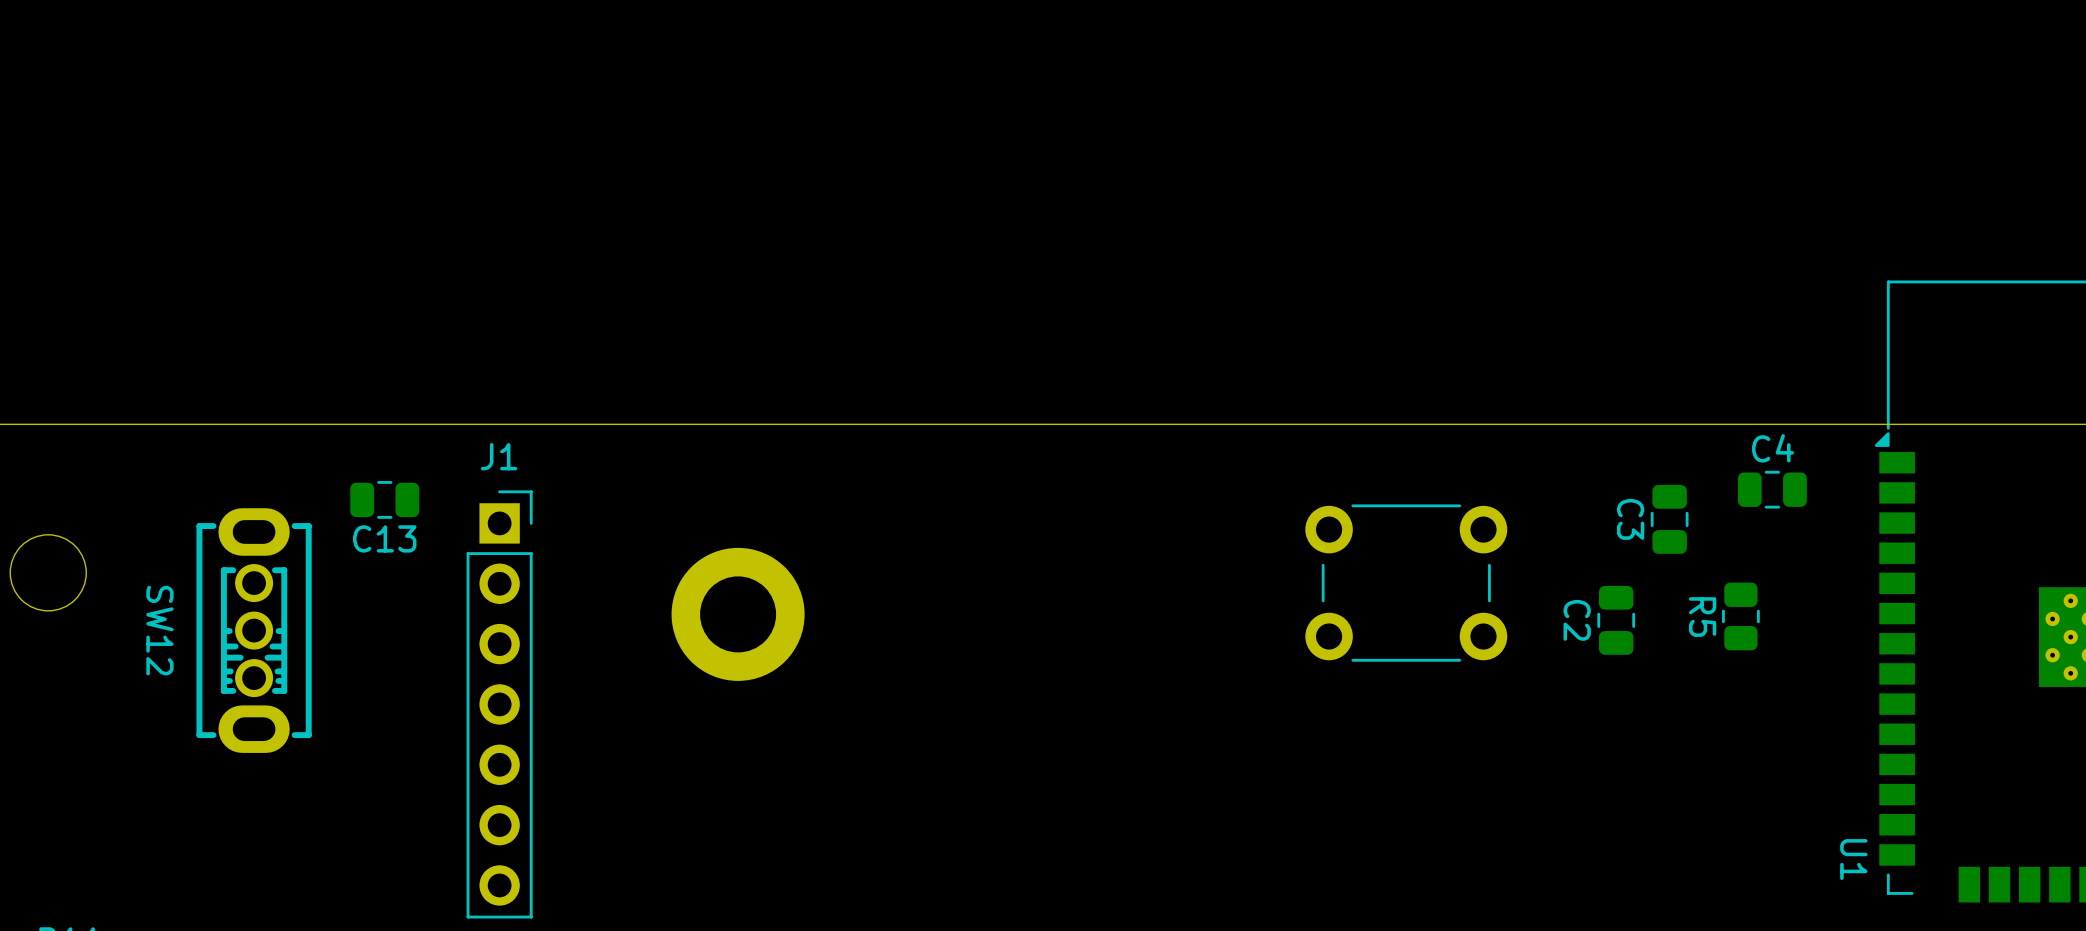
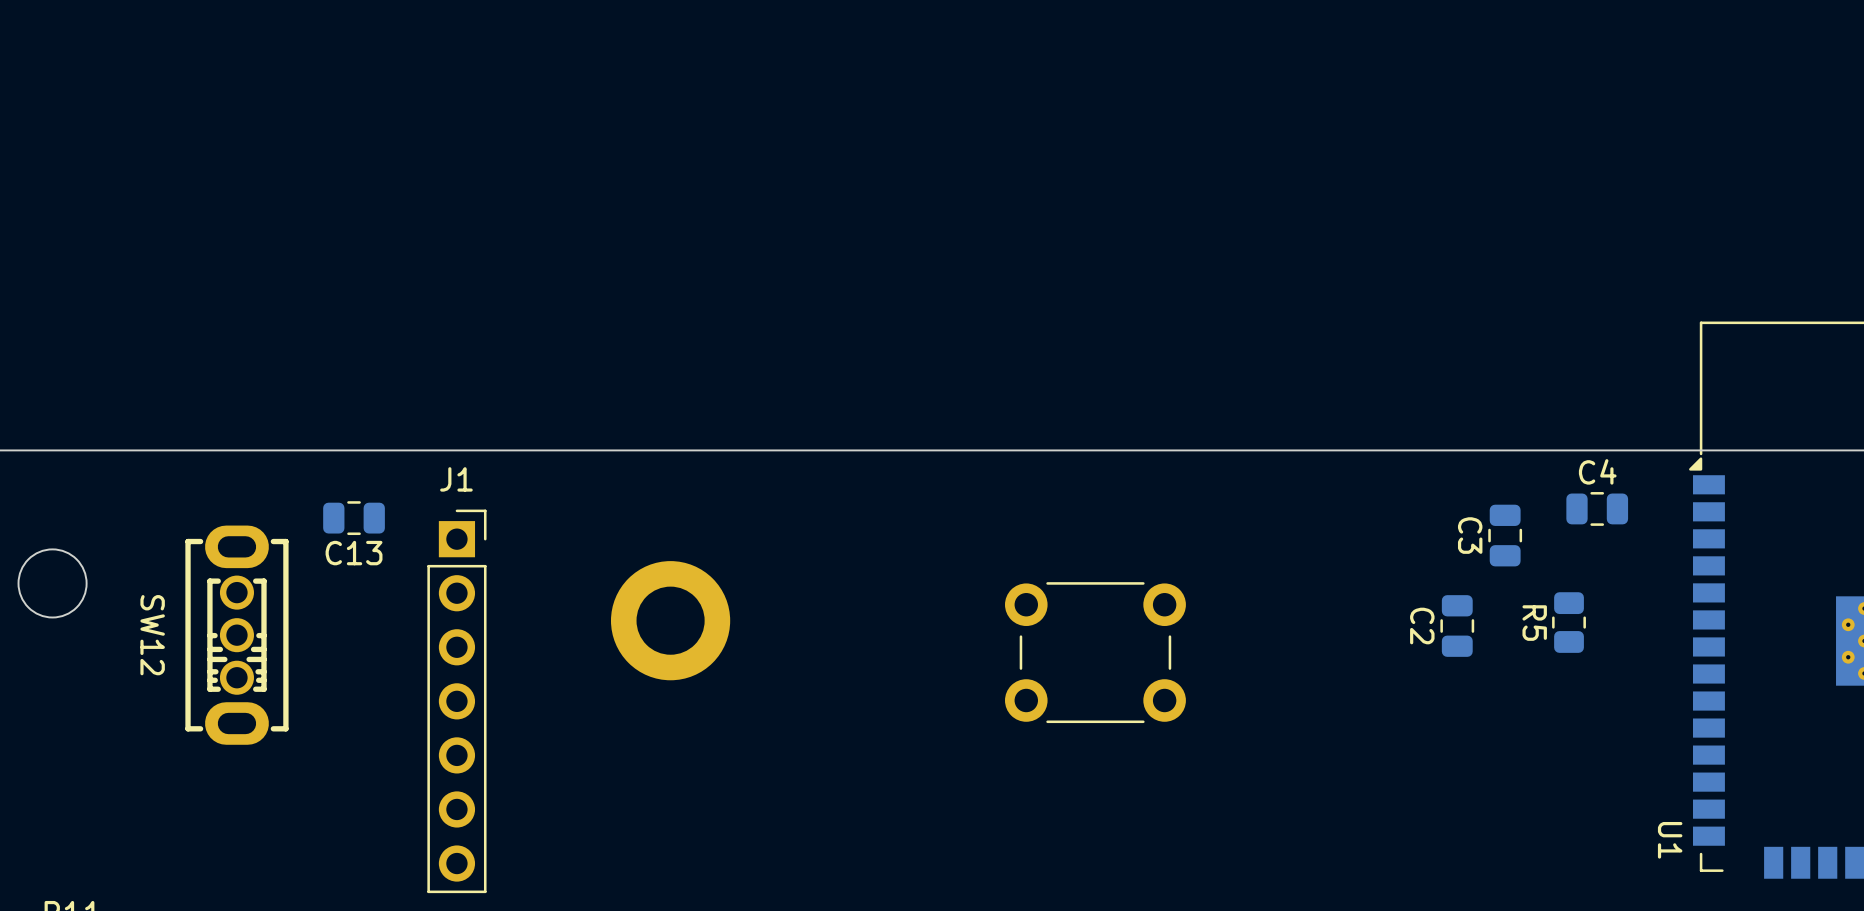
part position: (1406, 583) -> (1095, 652)

